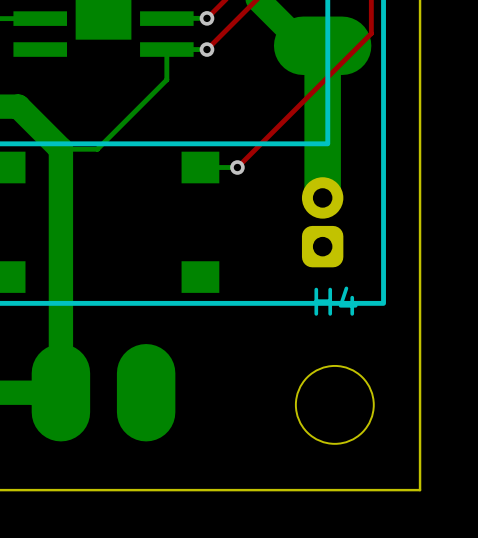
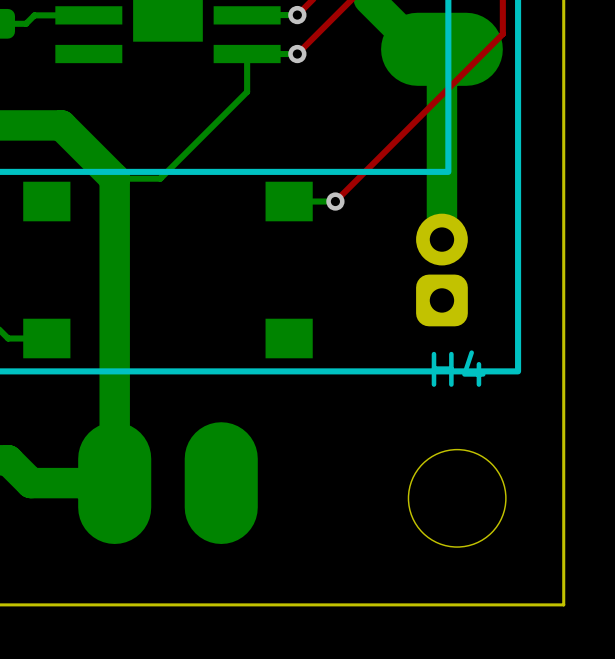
bottom track width: thick (322, 70) (322, 197) -> thin (441, 79) (441, 239)

